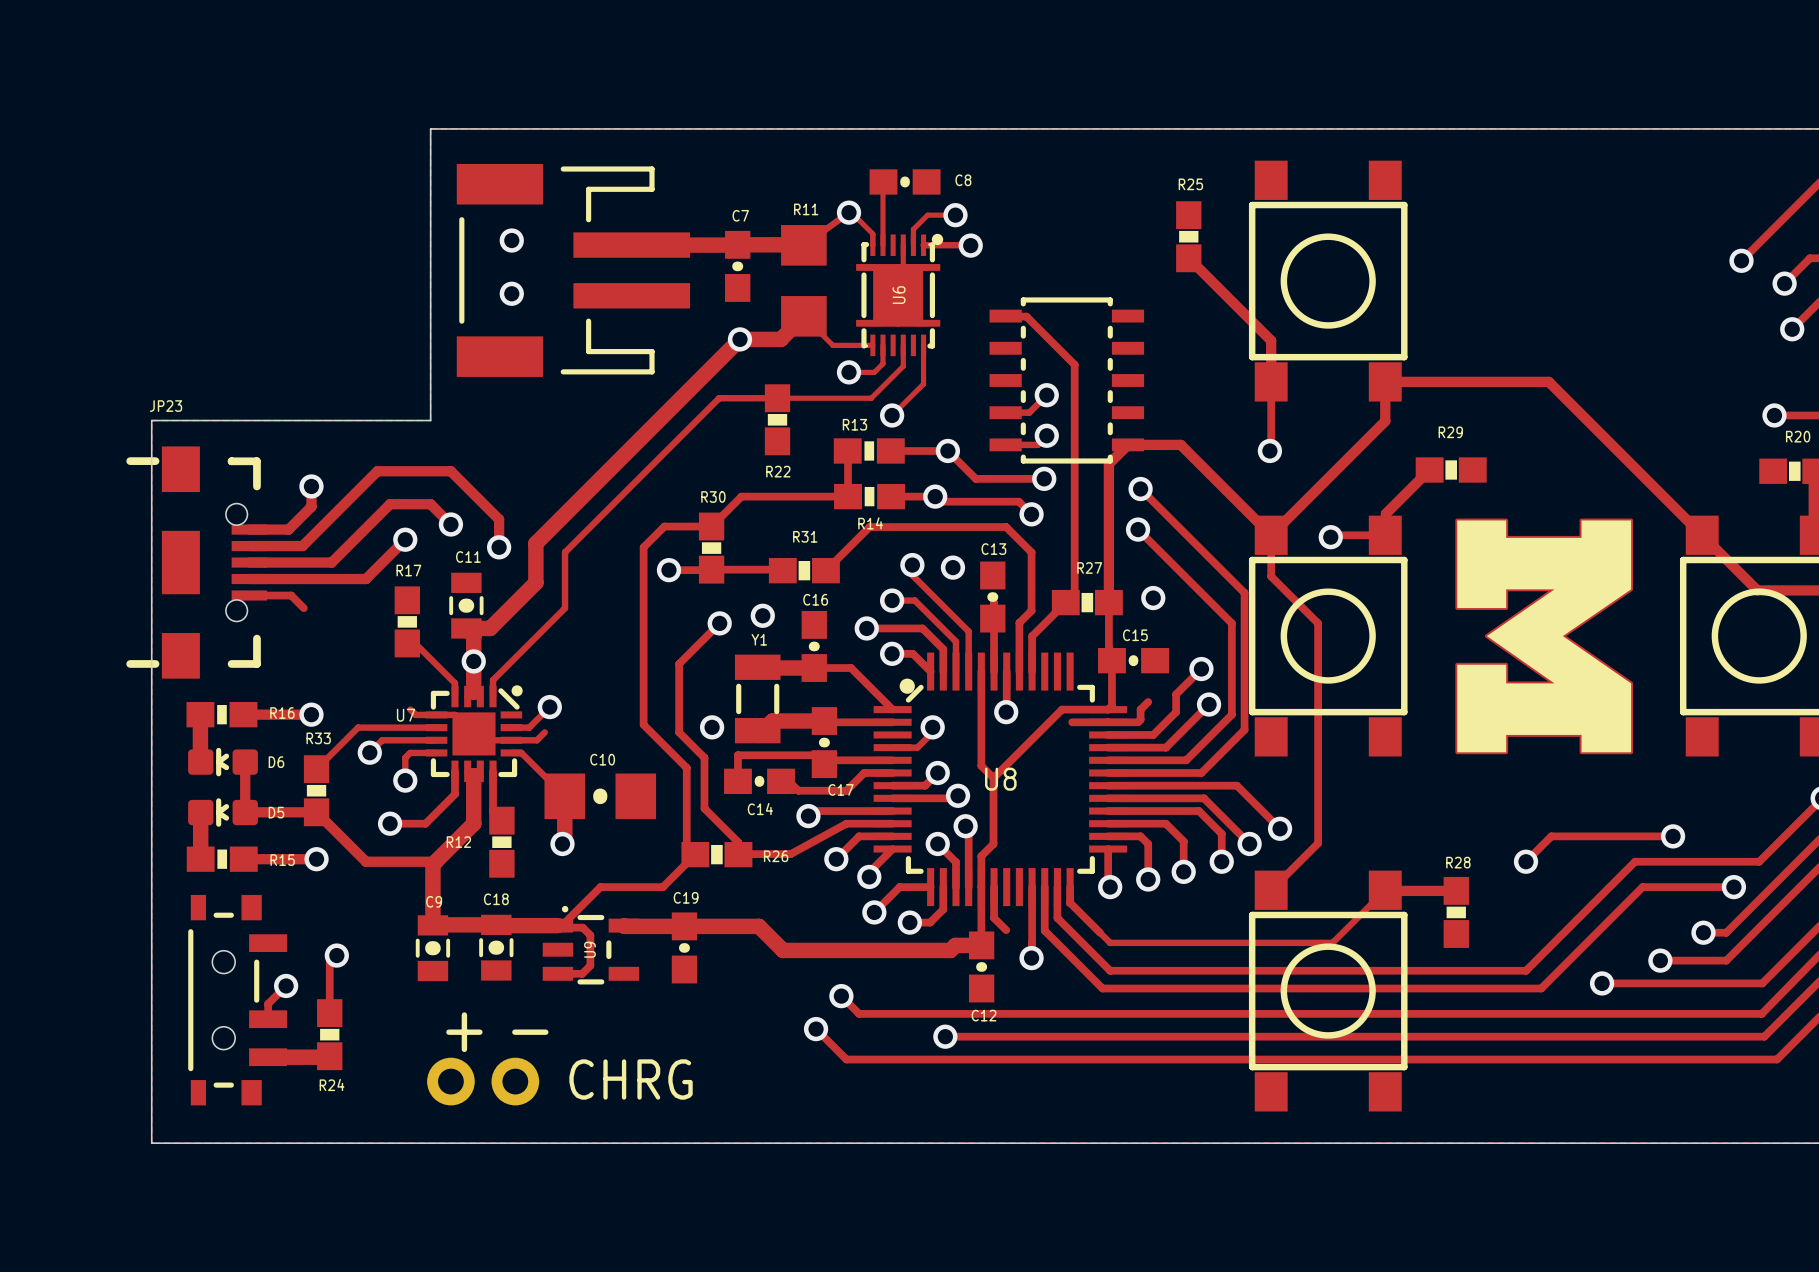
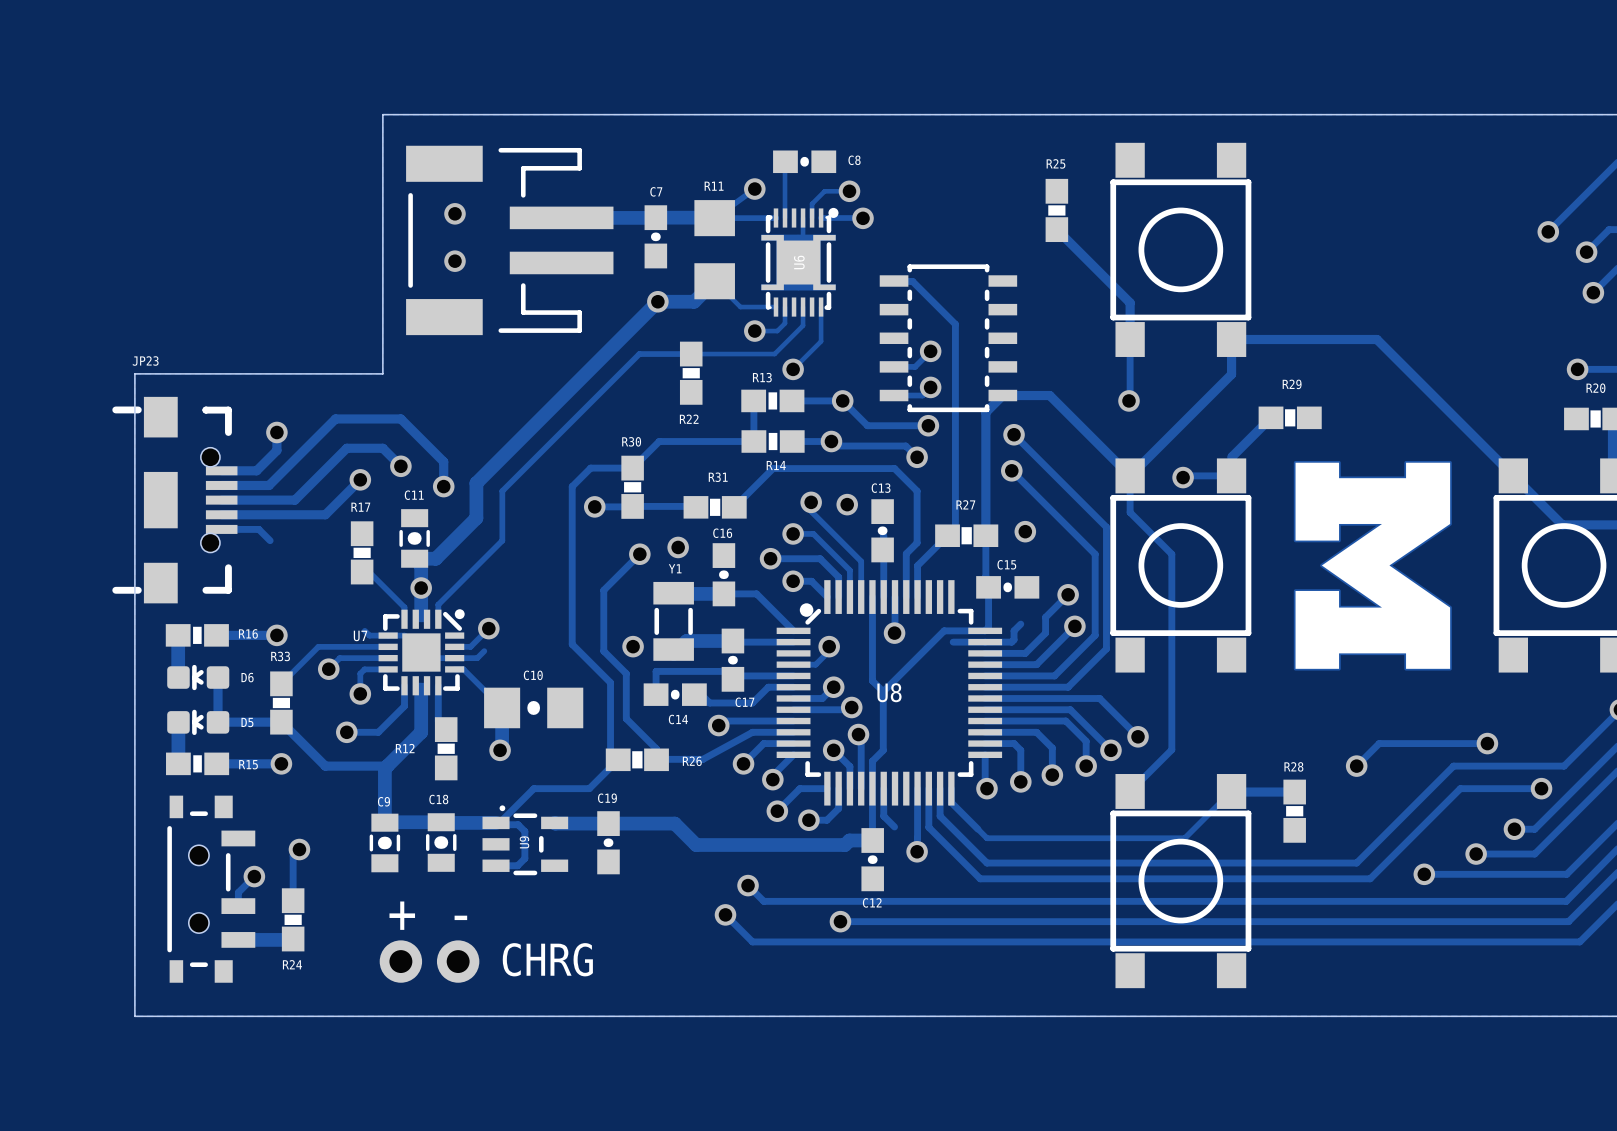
track: (849, 212) (851, 212) (872, 233) (872, 245) -> (714, 218) (775, 218)

